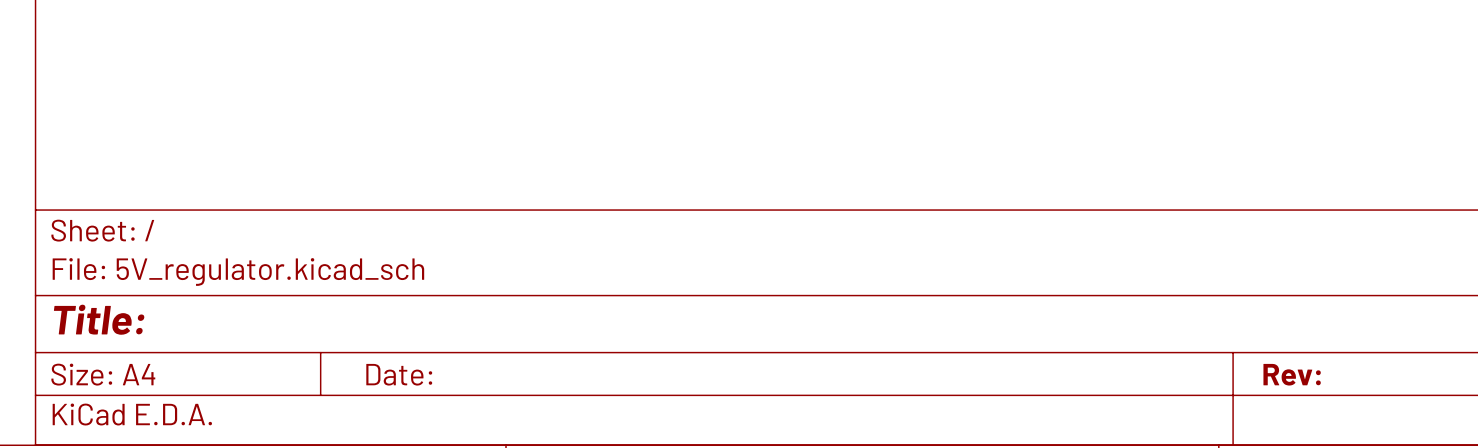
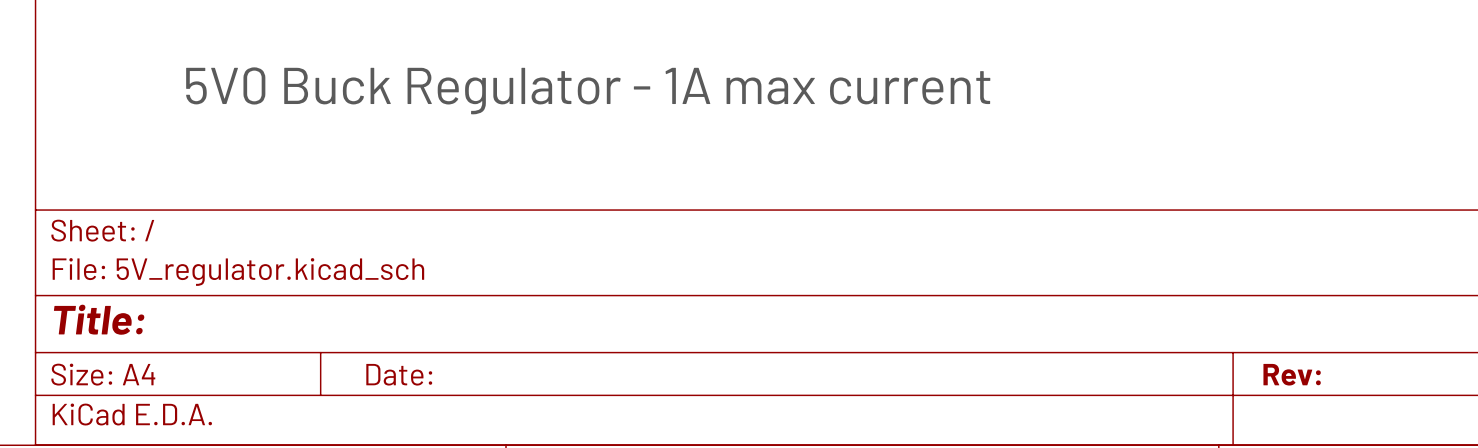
text: none -> 5V0 Buck Regulator - 1A max current (588, 90)

